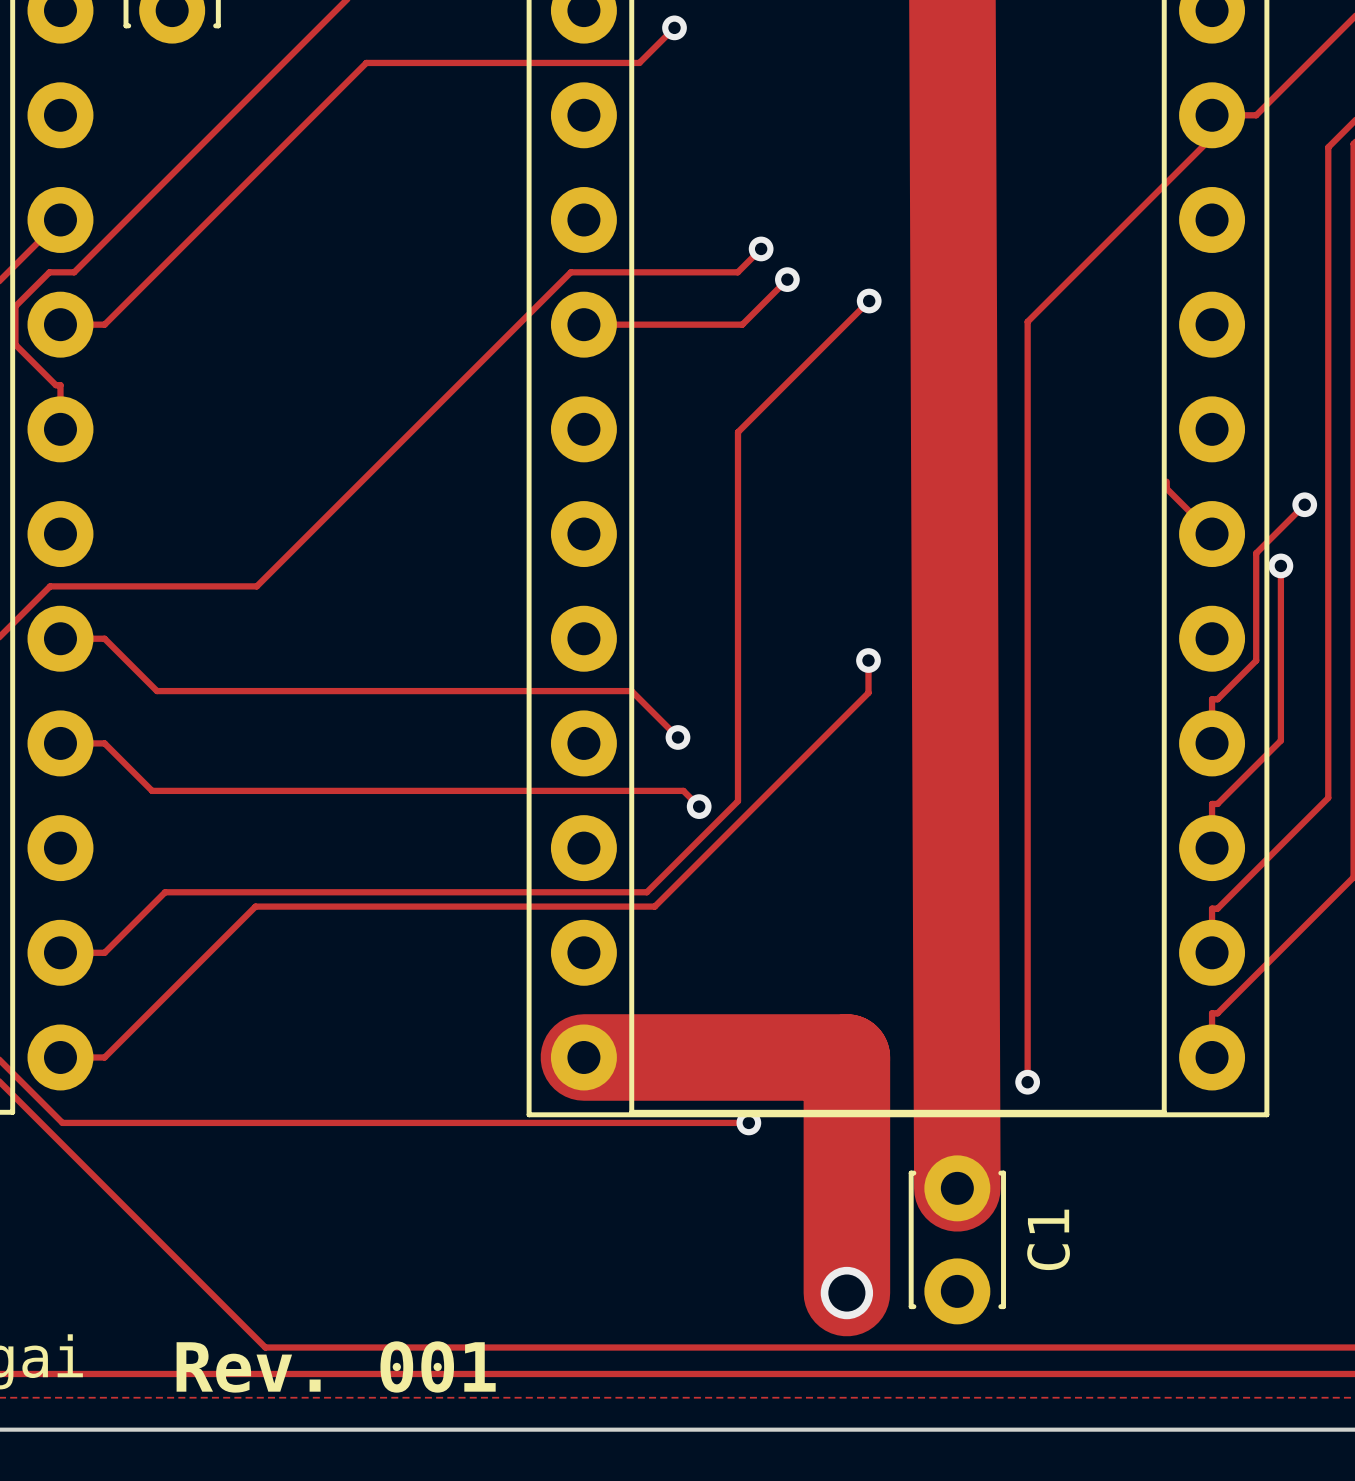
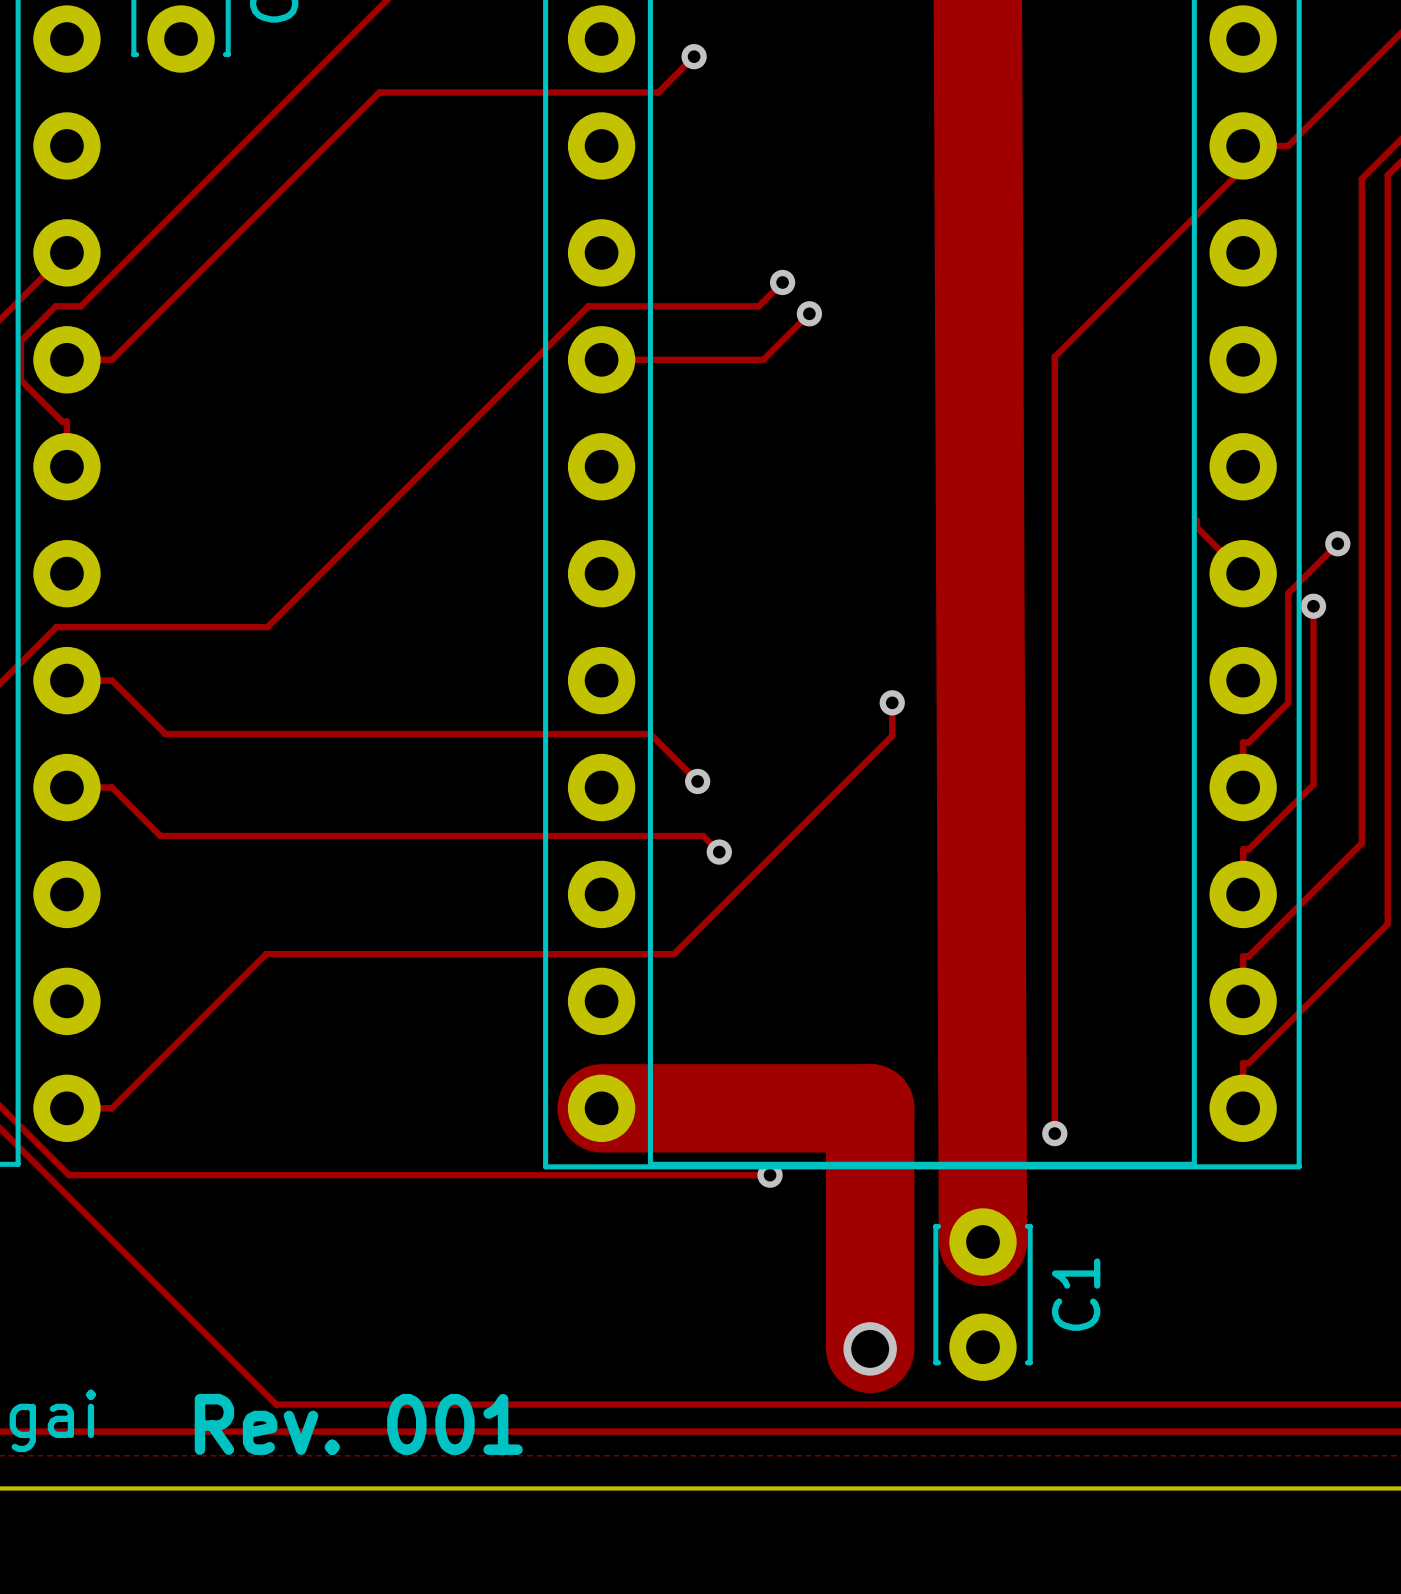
track: (869, 301) (738, 432) (738, 801) (646, 892) (165, 892) (104, 952) (60, 952) -> none
via: (869, 301) -> none

